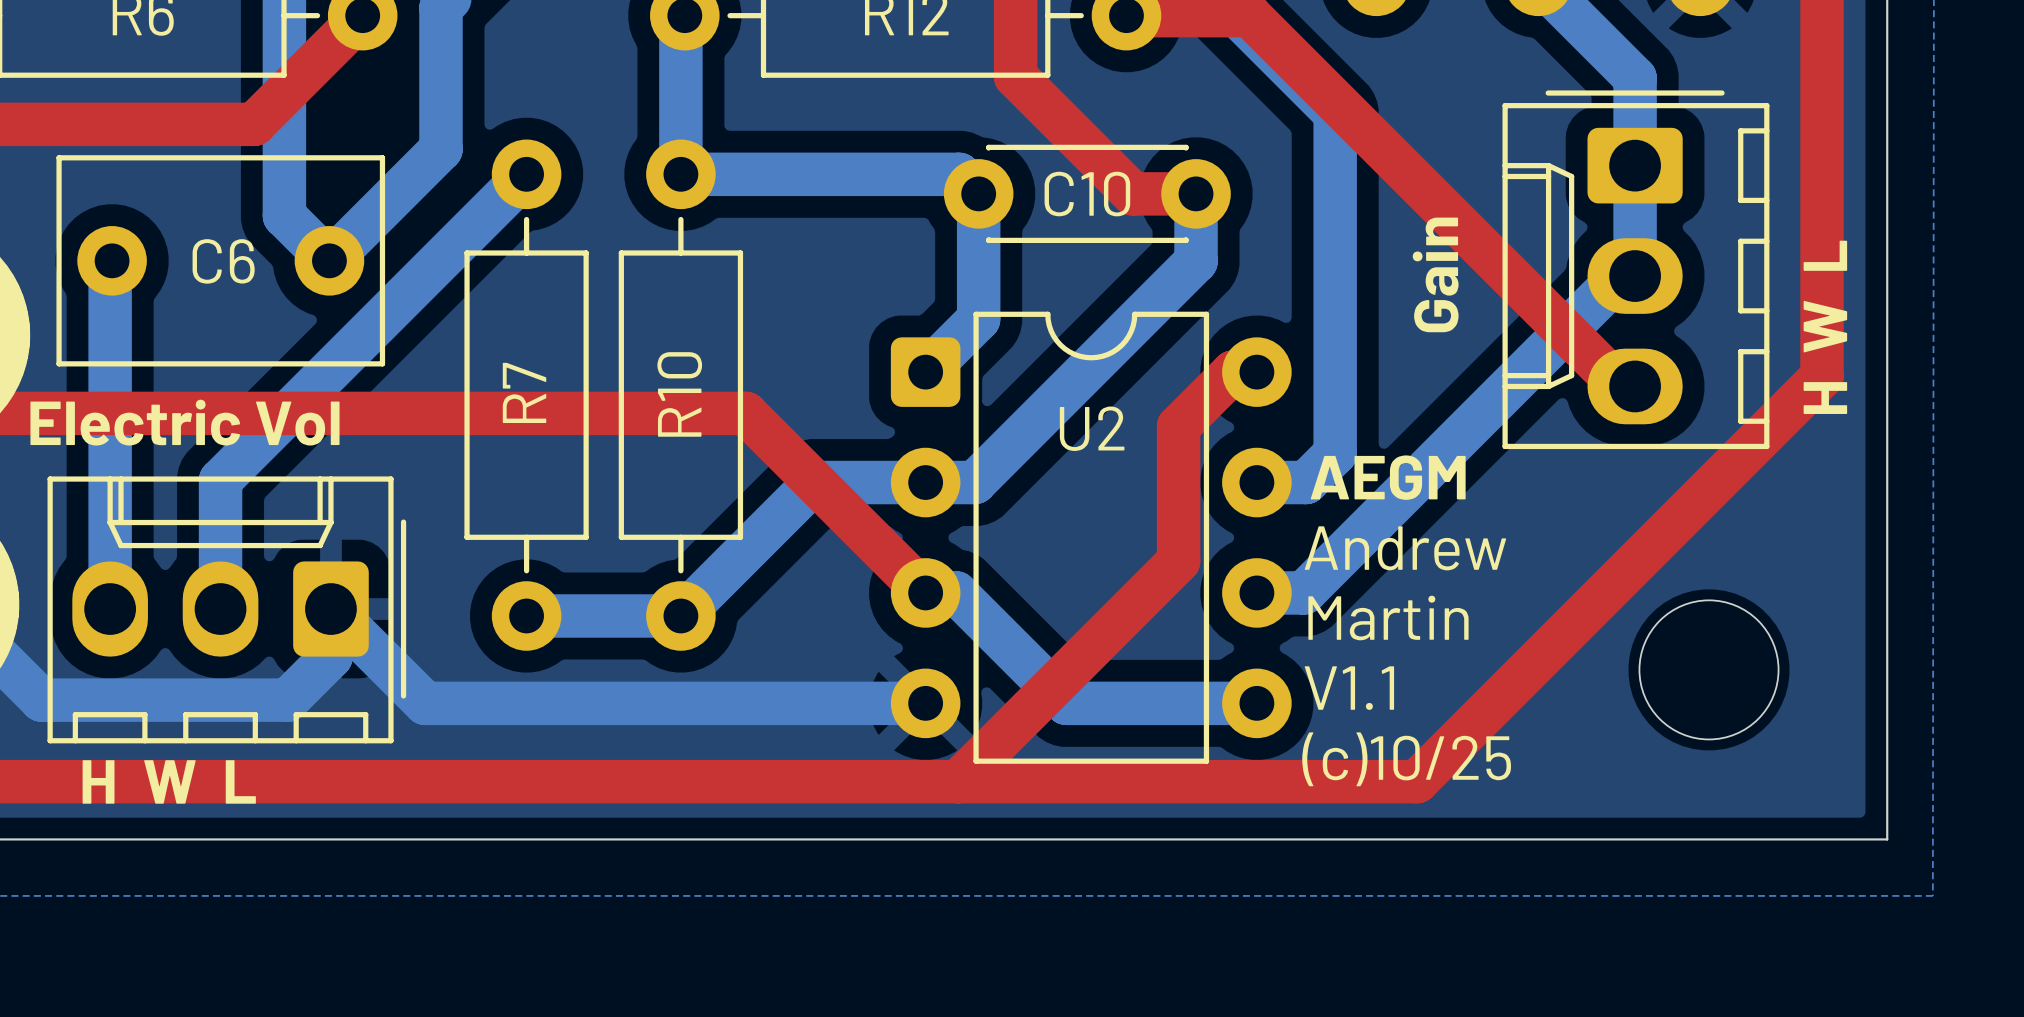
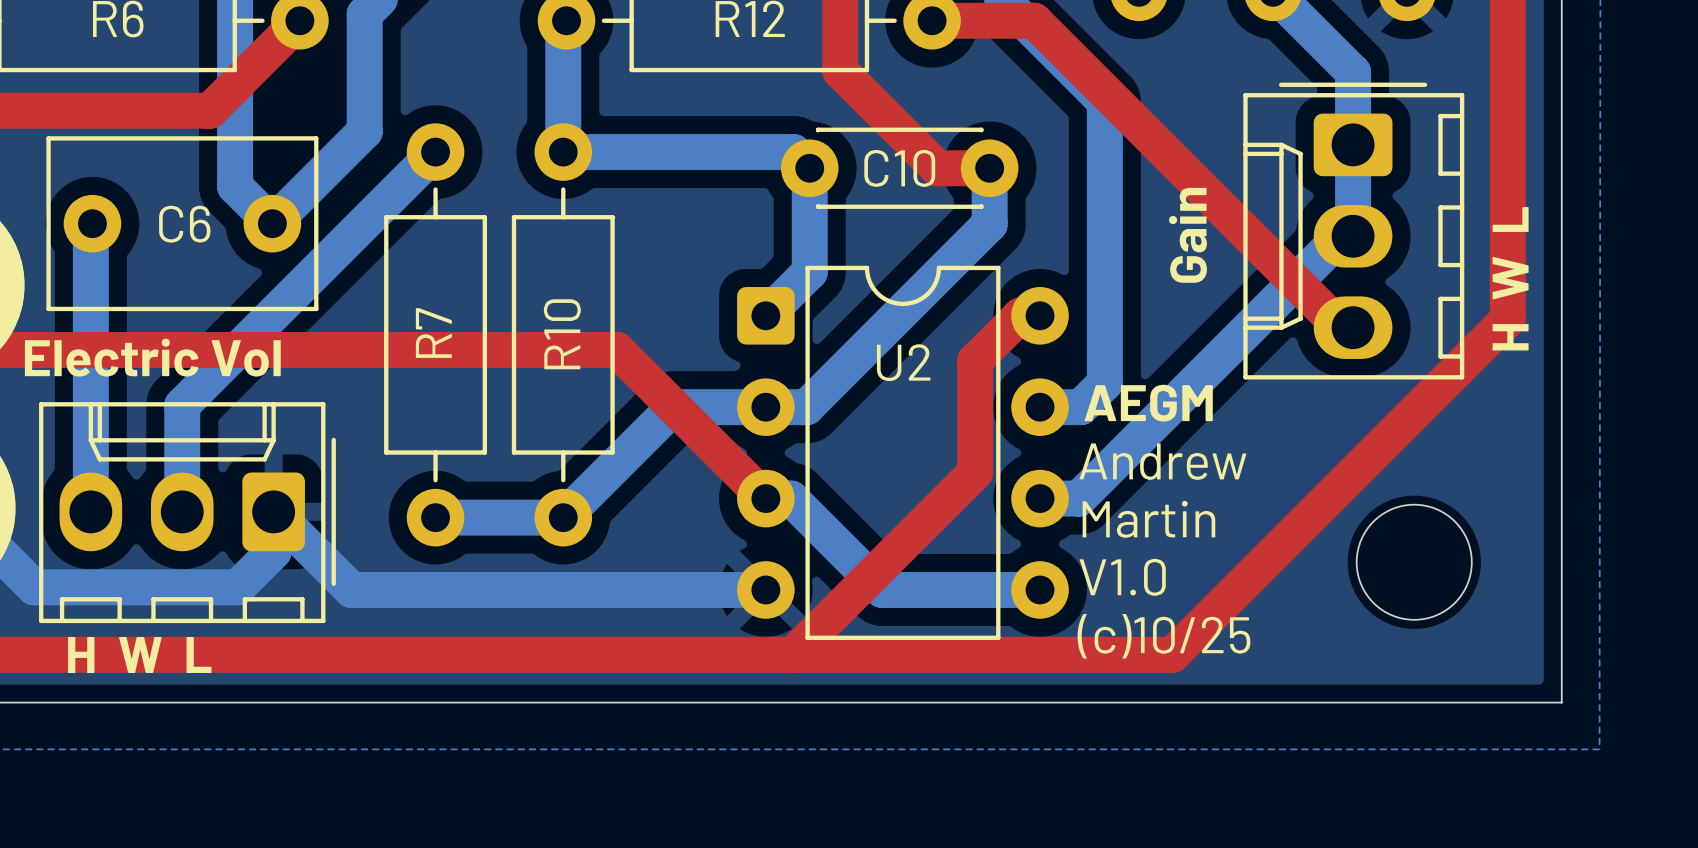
text: V1.1 (1349, 688) -> V1.0 (1122, 577)

